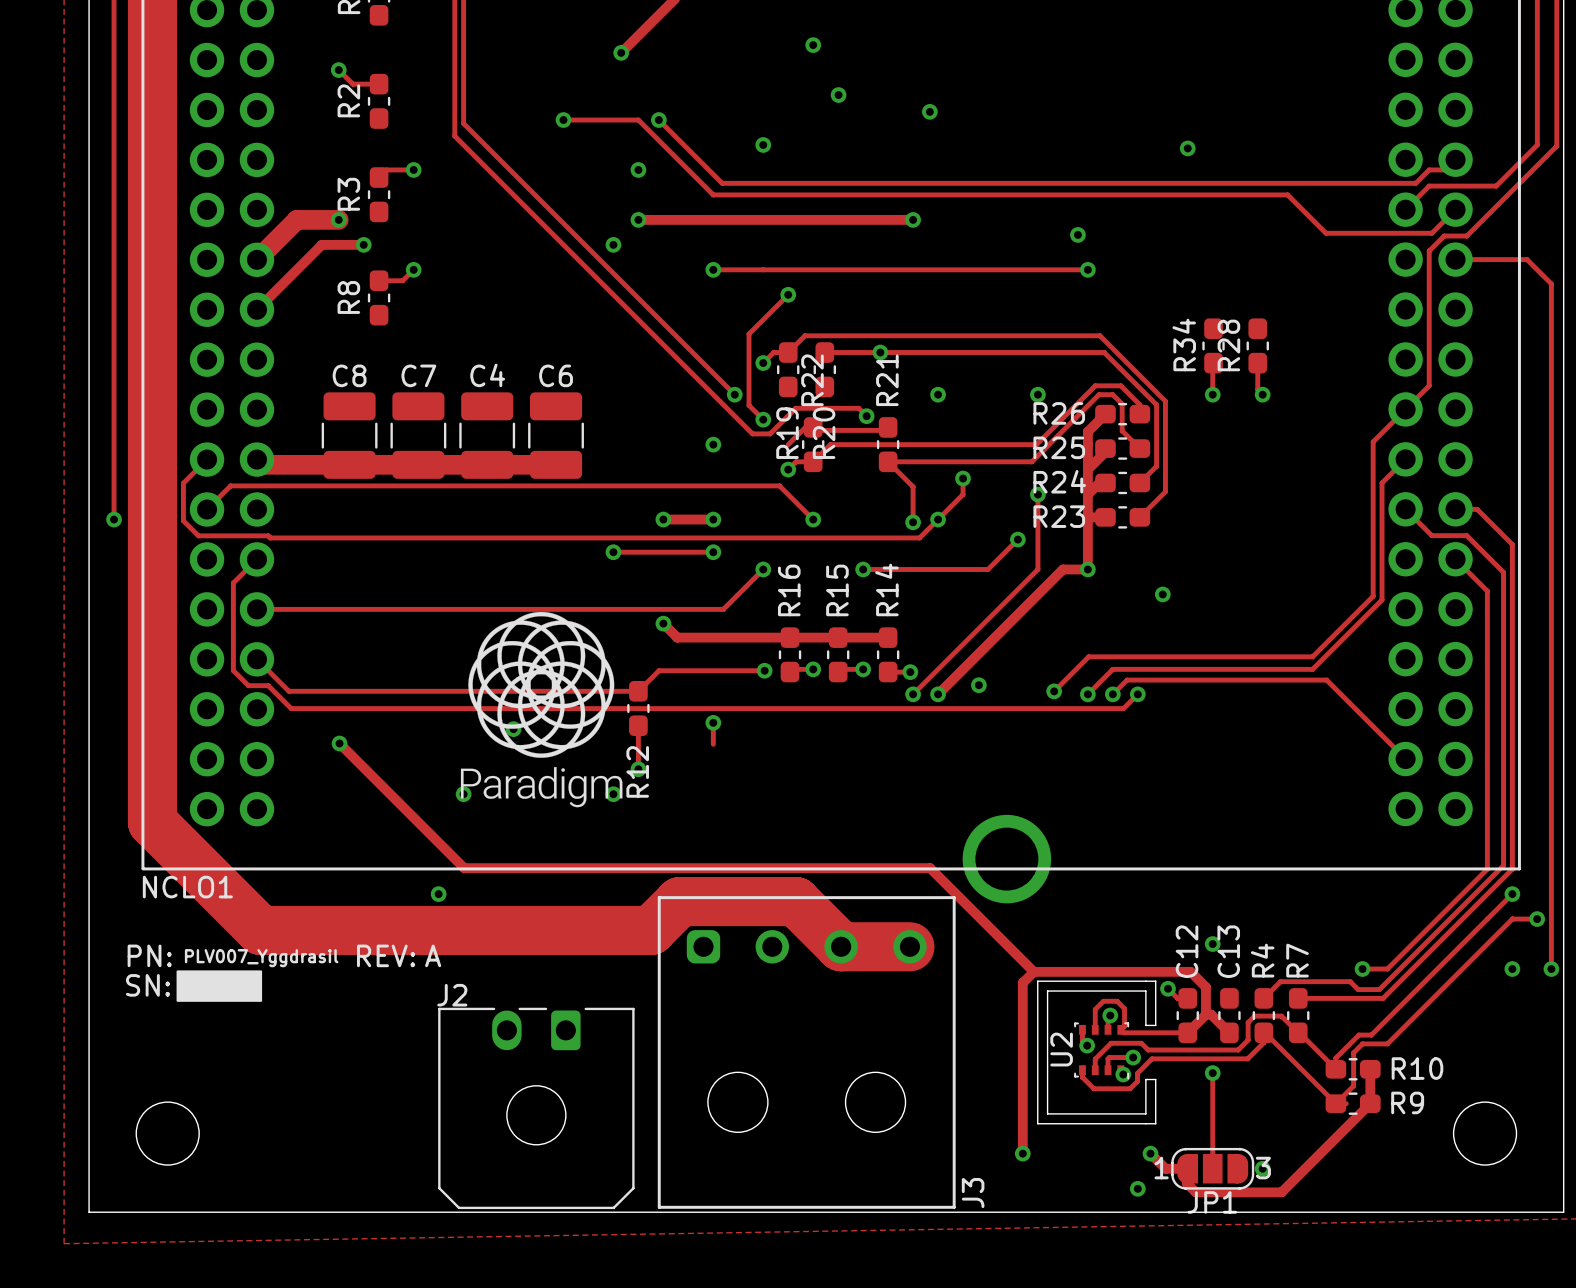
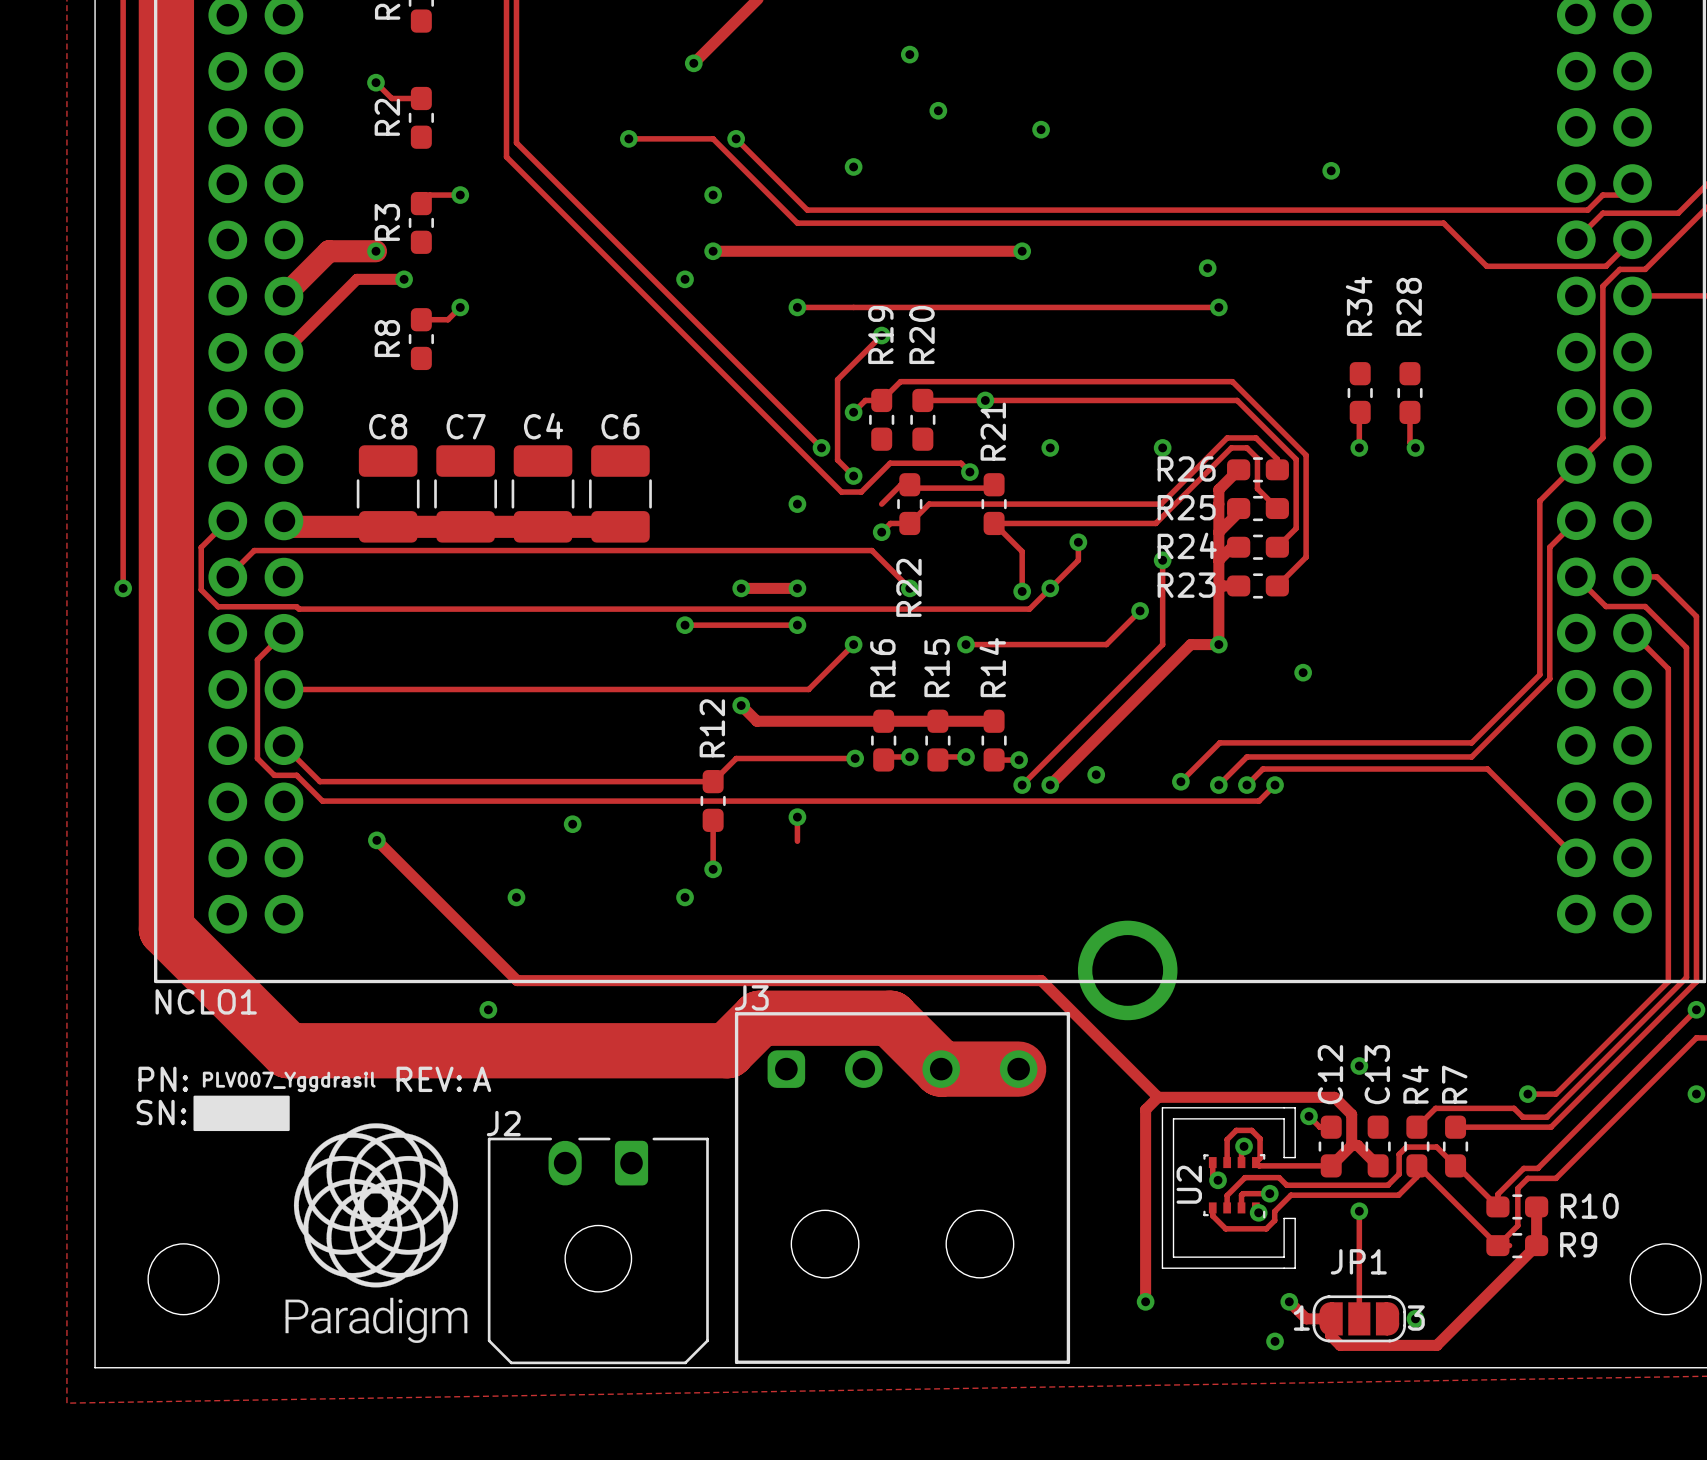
R34 name position: R34 (1184, 344) -> R34 (1359, 306)
R28 name position: R28 (1228, 345) -> R28 (1409, 306)
R22 name position: R22 (812, 380) -> R22 (908, 587)
R19 name position: R19 (787, 433) -> R19 (880, 335)
R20 name position: R20 (824, 433) -> R20 (922, 335)
drawing position: (541, 709) -> (376, 1233)
R12 name position: R12 (637, 771) -> R12 (712, 728)
J3 name rotation: 0° (973, 1193) -> 90° clockwise (751, 997)
J3 name position: J3 (973, 1193) -> J3 (751, 997)
JP1 name position: JP1 (1212, 1202) -> JP1 (1358, 1261)

